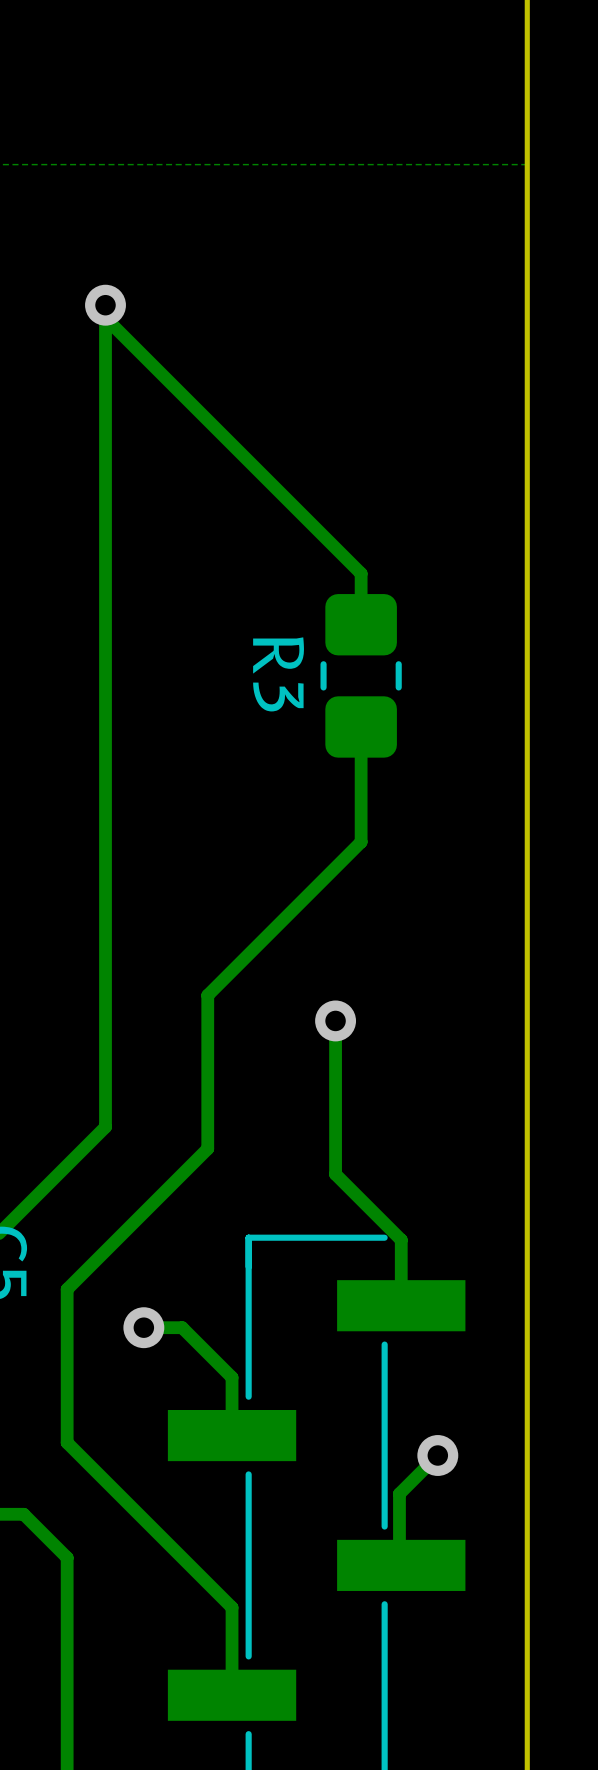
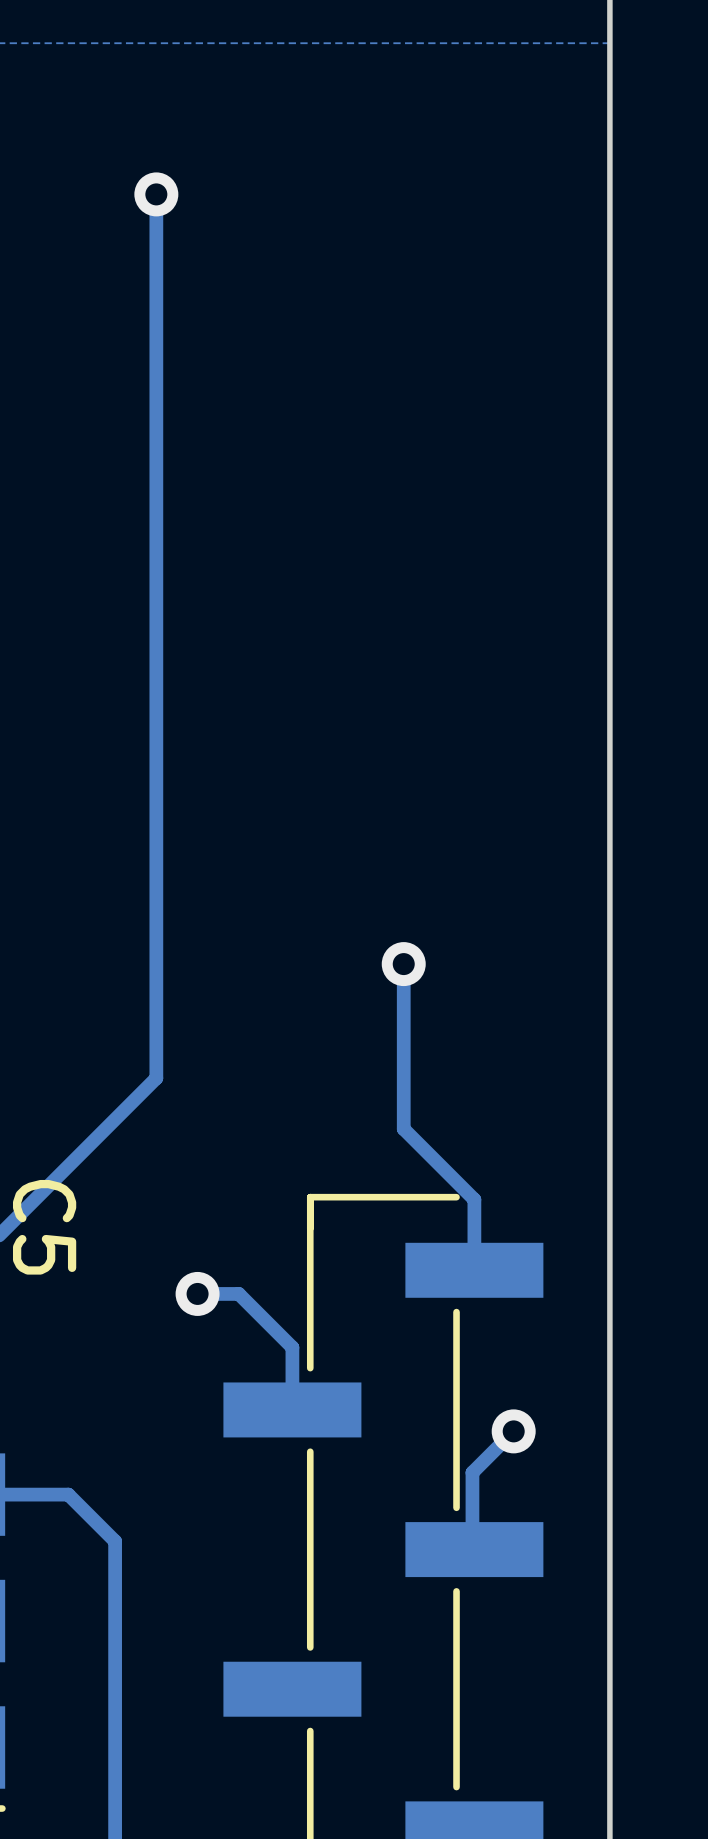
track: (105, 317) (361, 573) (361, 624) -> none
R3: (361, 675) -> none
track: (361, 726) (361, 842) (207, 995) (207, 1148) (67, 1289) (67, 1442) (232, 1607) (232, 1695) -> none

